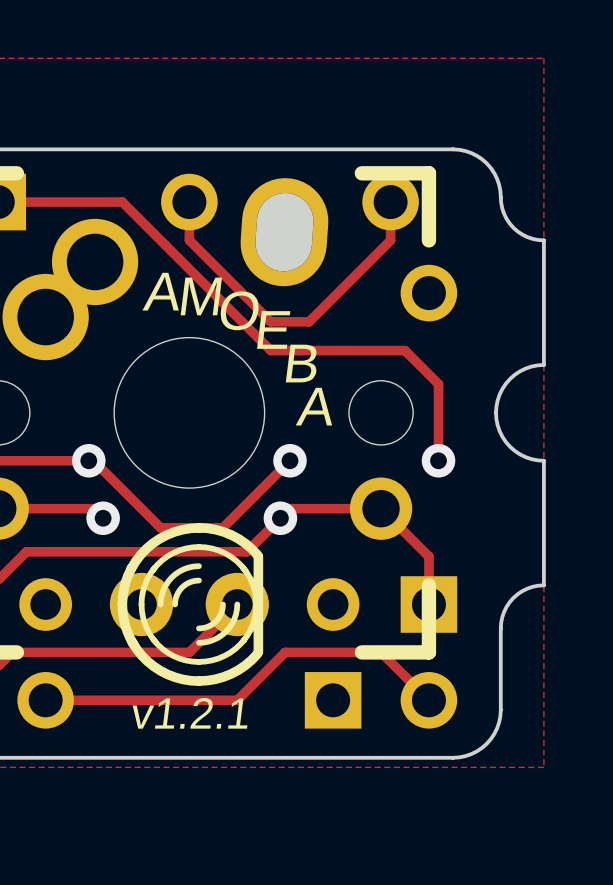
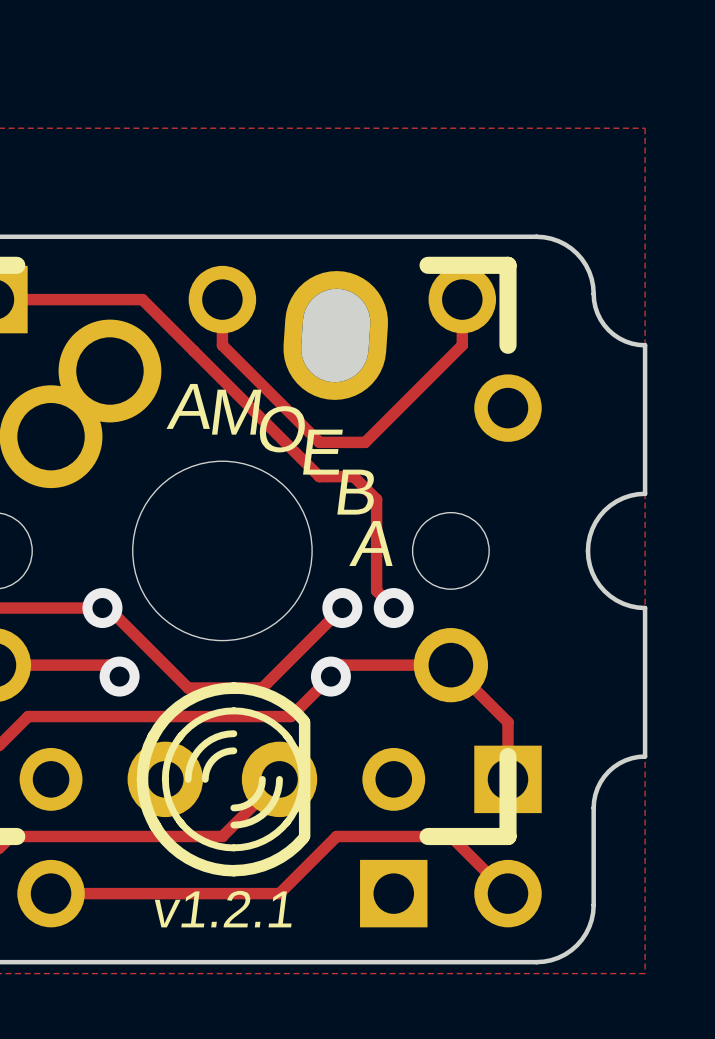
track: (299, 350) (404, 350) (438, 384) (438, 460) -> (353, 476) (376, 499) (376, 590) (393, 608)
via position: (438, 460) -> (393, 608)

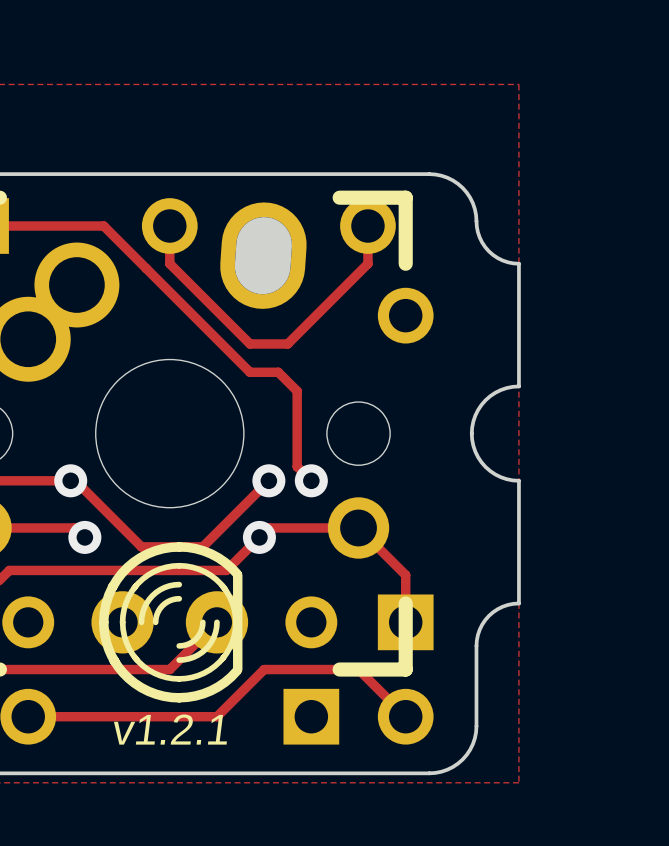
text: A (188, 406) -> none
text: M (236, 412) -> none
text: O (282, 429) -> none
text: E (322, 452) -> none
text: B (356, 492) -> none
text: A (370, 543) -> none

